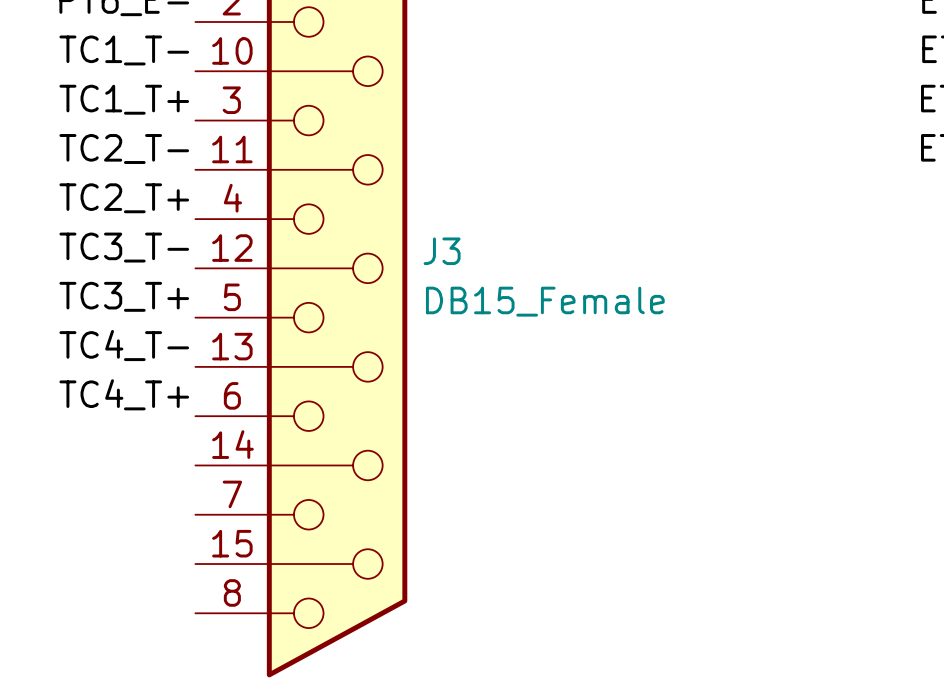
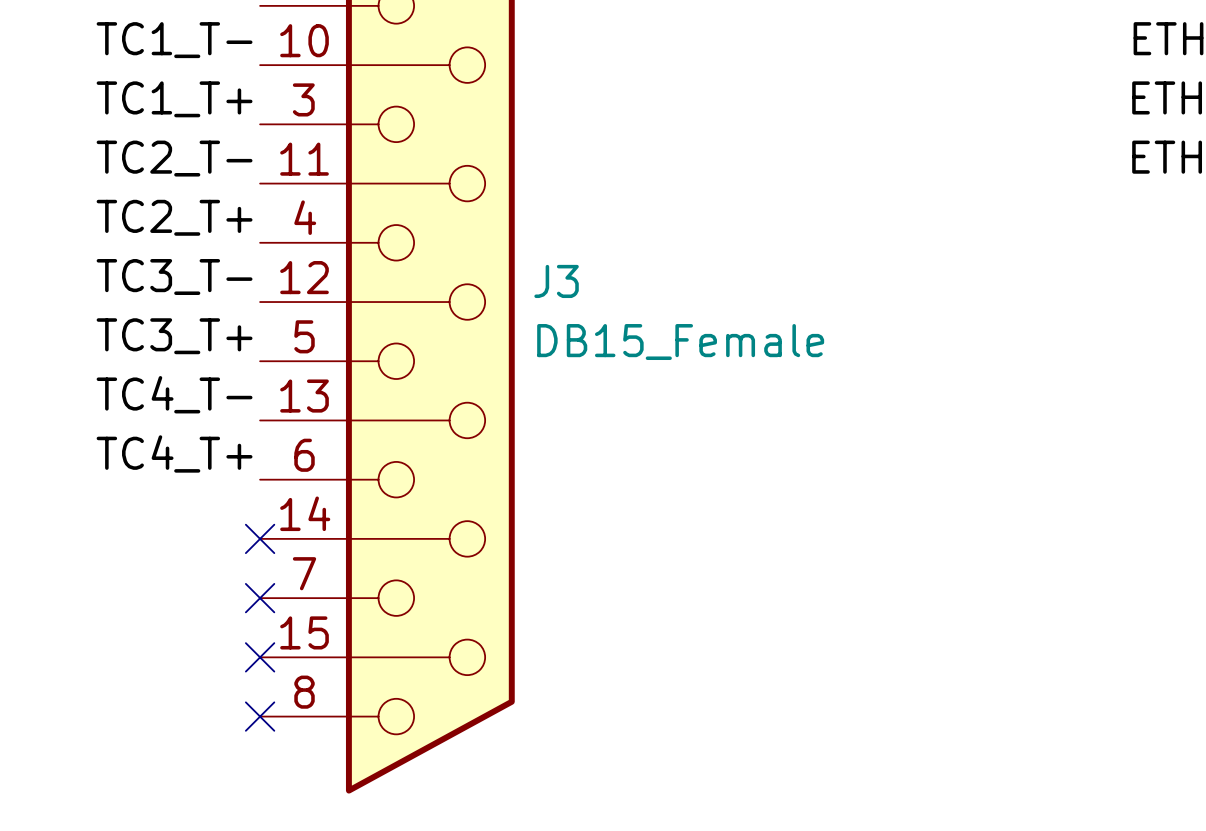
no-connect mark: none -> (260, 538)
no-connect mark: none -> (260, 598)
no-connect mark: none -> (260, 657)
no-connect mark: none -> (260, 716)

